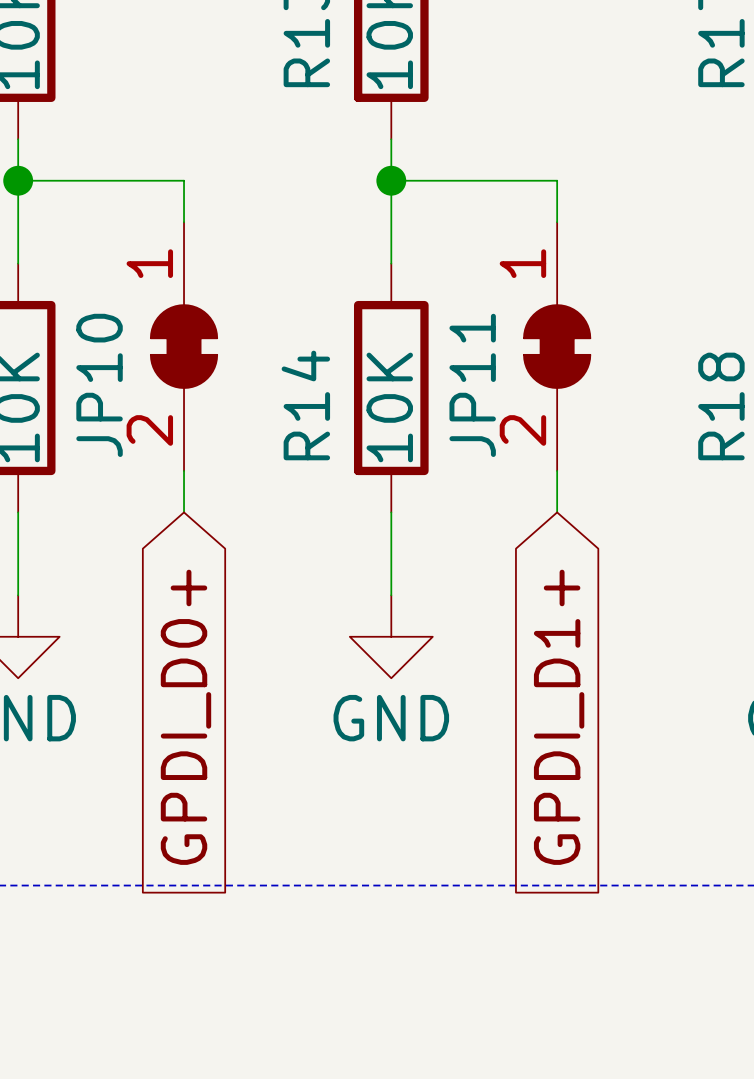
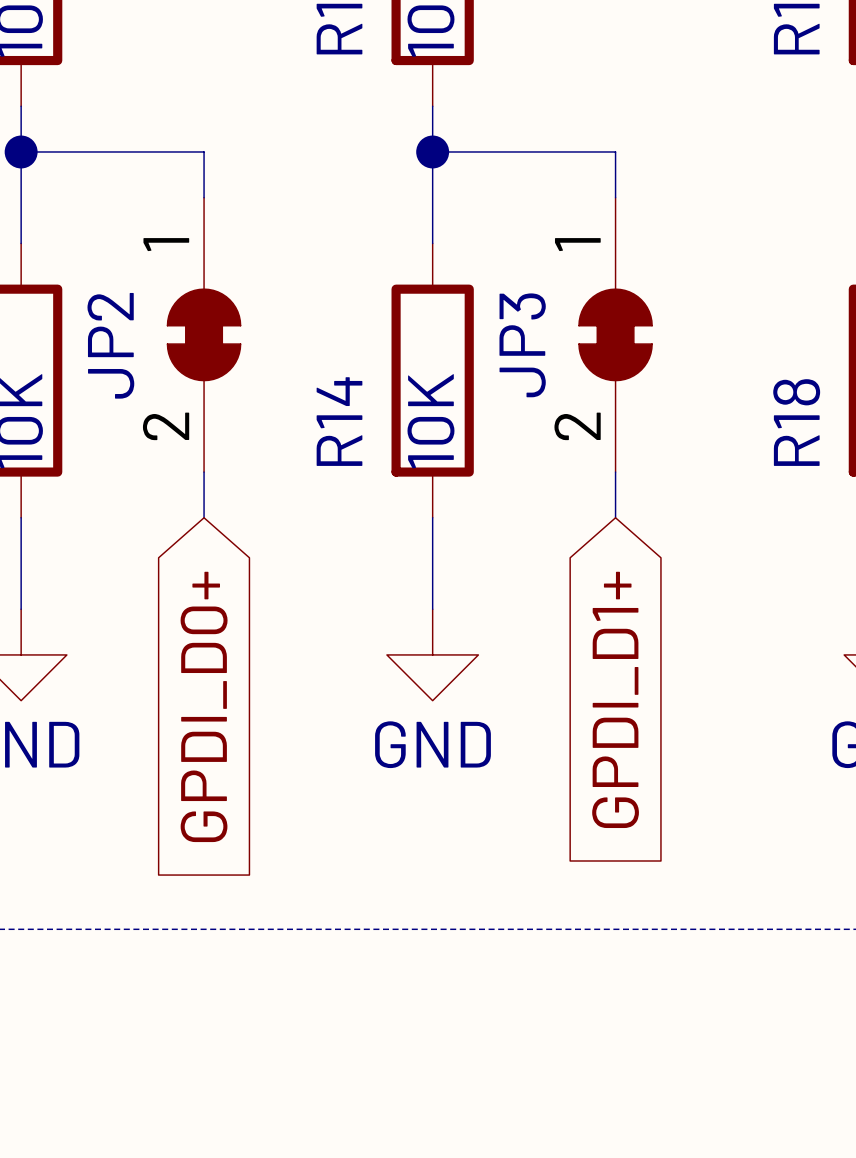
JP10 name: JP10 (99, 385) -> JP2 (110, 345)
JP11 name: JP11 (472, 385) -> JP3 (522, 345)

